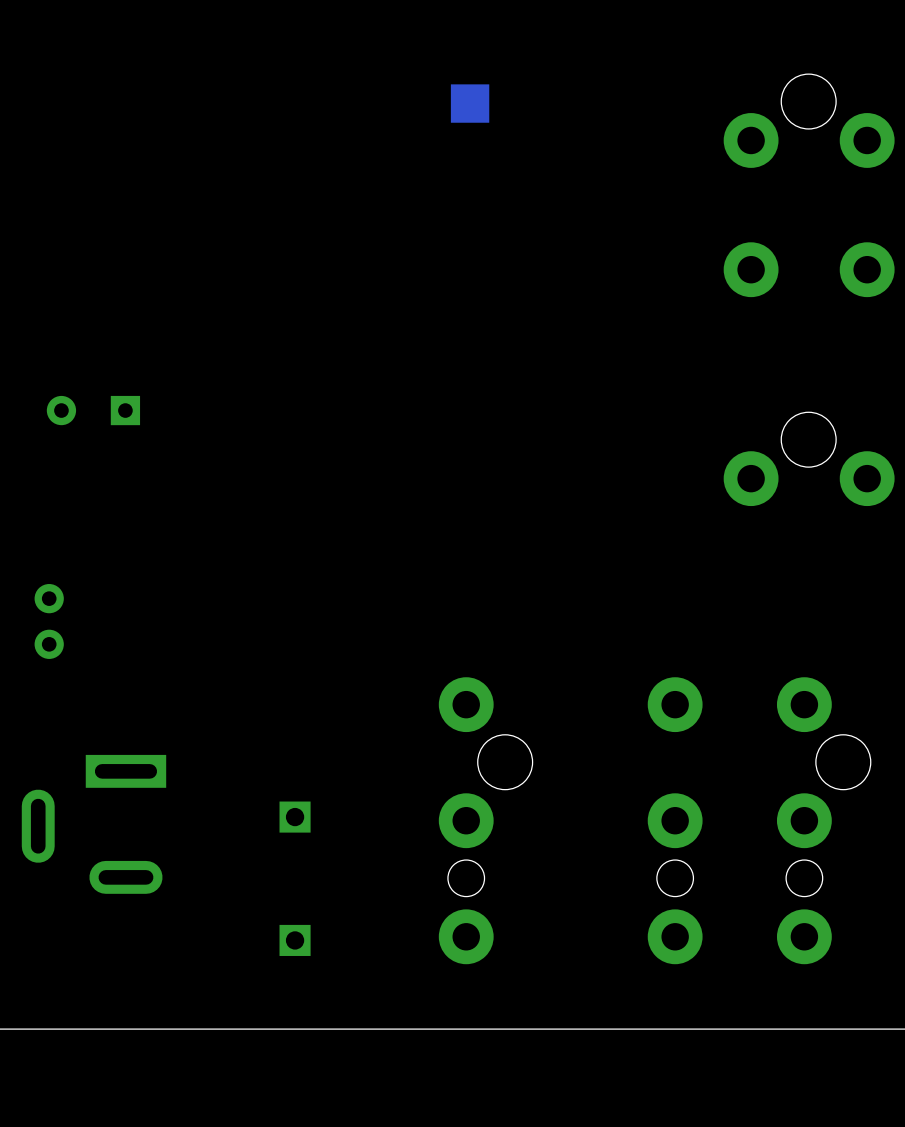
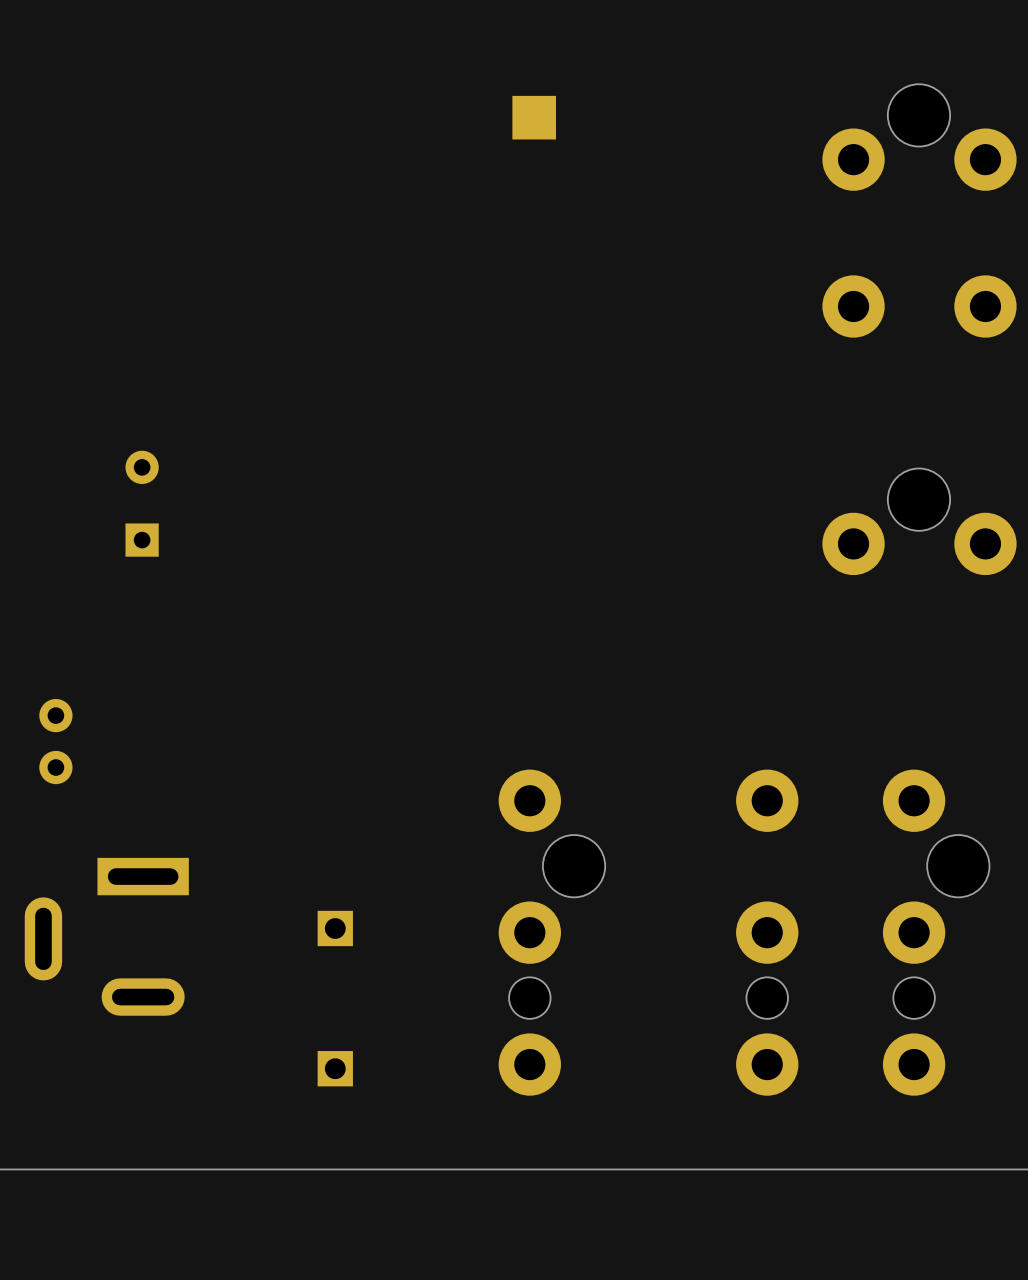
part rotation: 0° (93, 410) -> 90° clockwise (142, 503)
part position: (49, 621) -> (55, 741)

